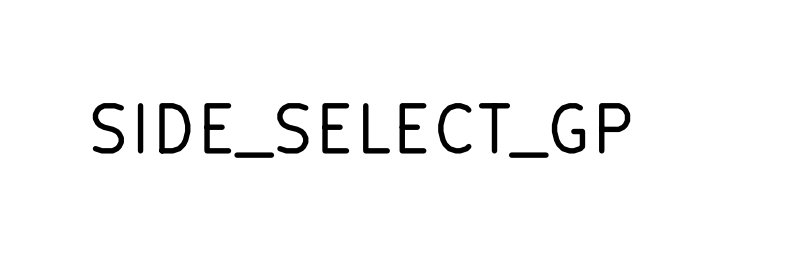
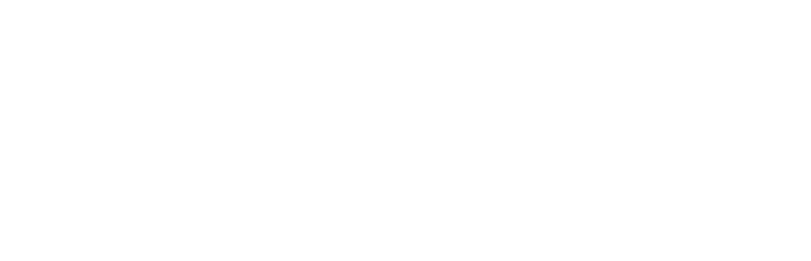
label: SIDE_SELECT_GP (361, 130) -> none

